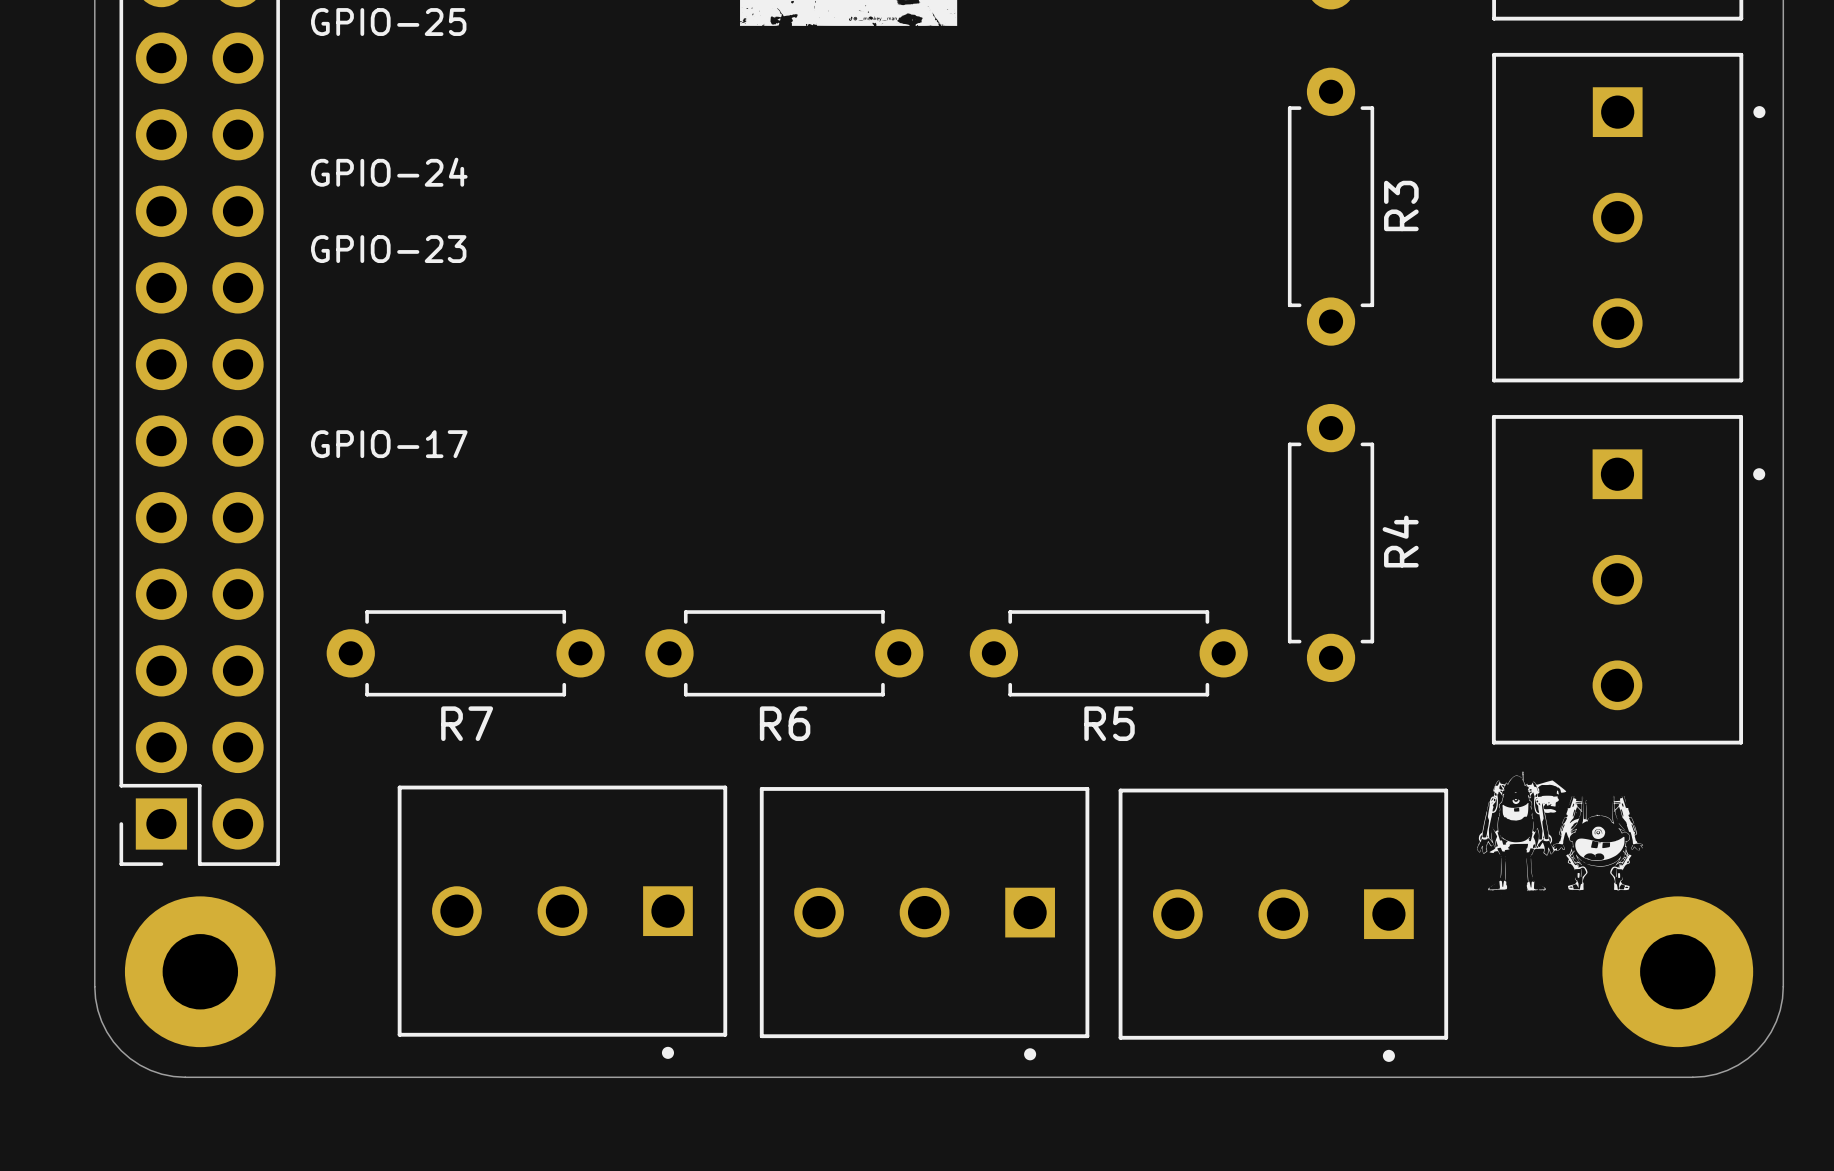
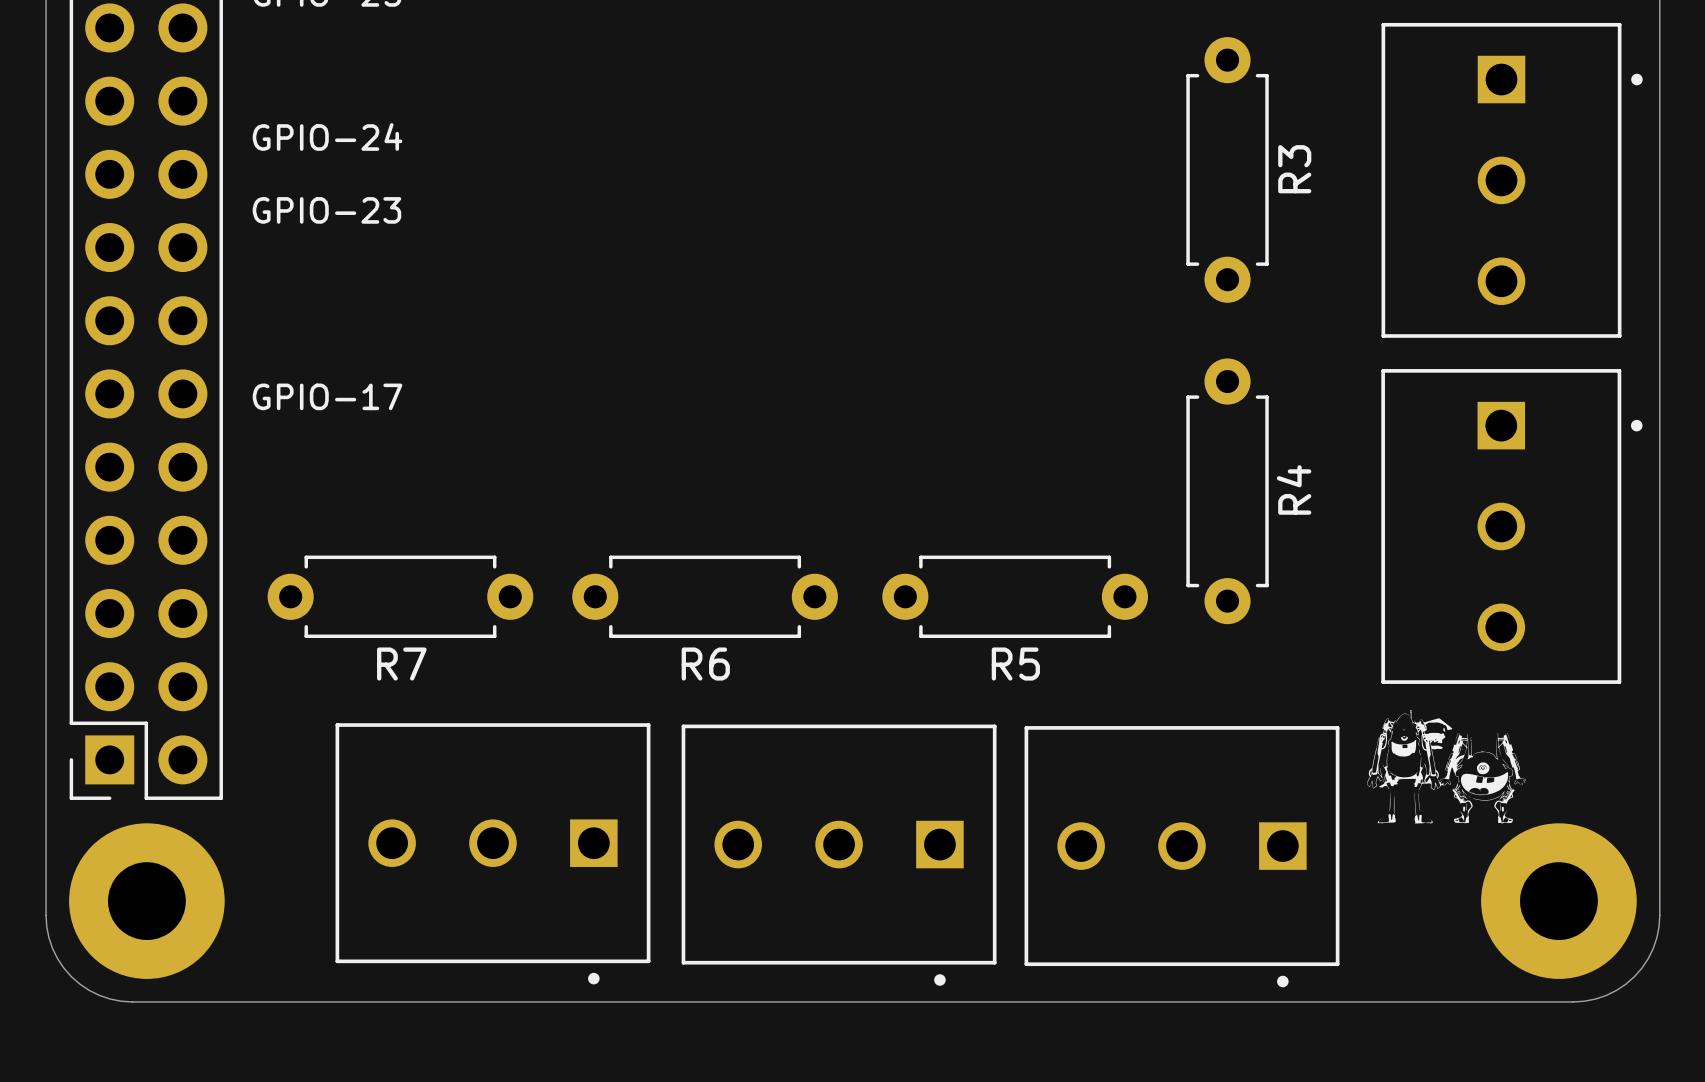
part footprint: [124, 896, 276, 1048] -> [69, 823, 225, 979]
part footprint: [1602, 896, 1754, 1048] -> [1481, 823, 1637, 979]

